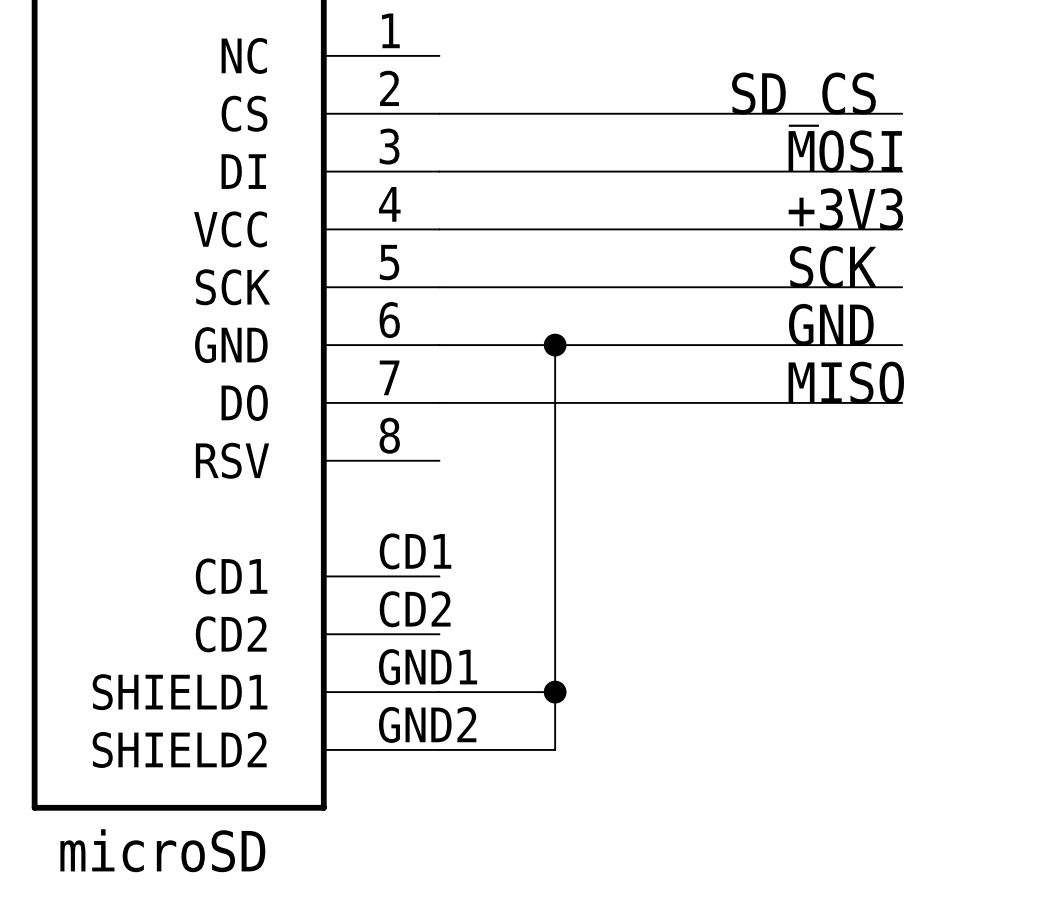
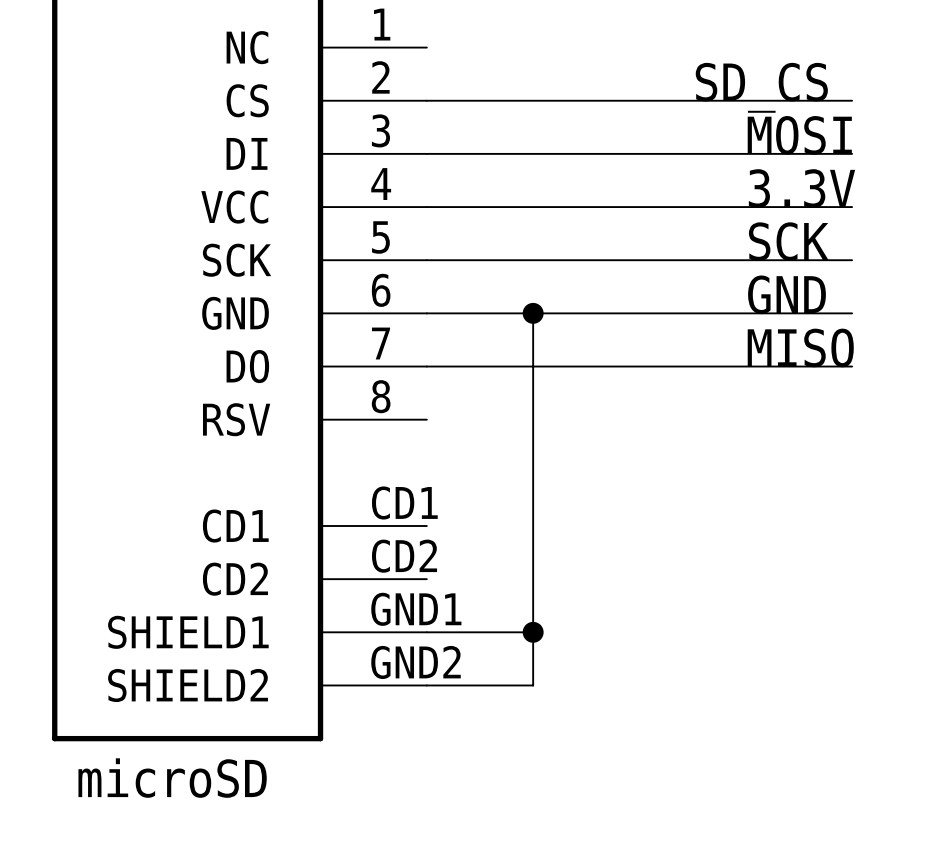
label: +3V3 (845, 209) -> 3.3V (801, 188)

